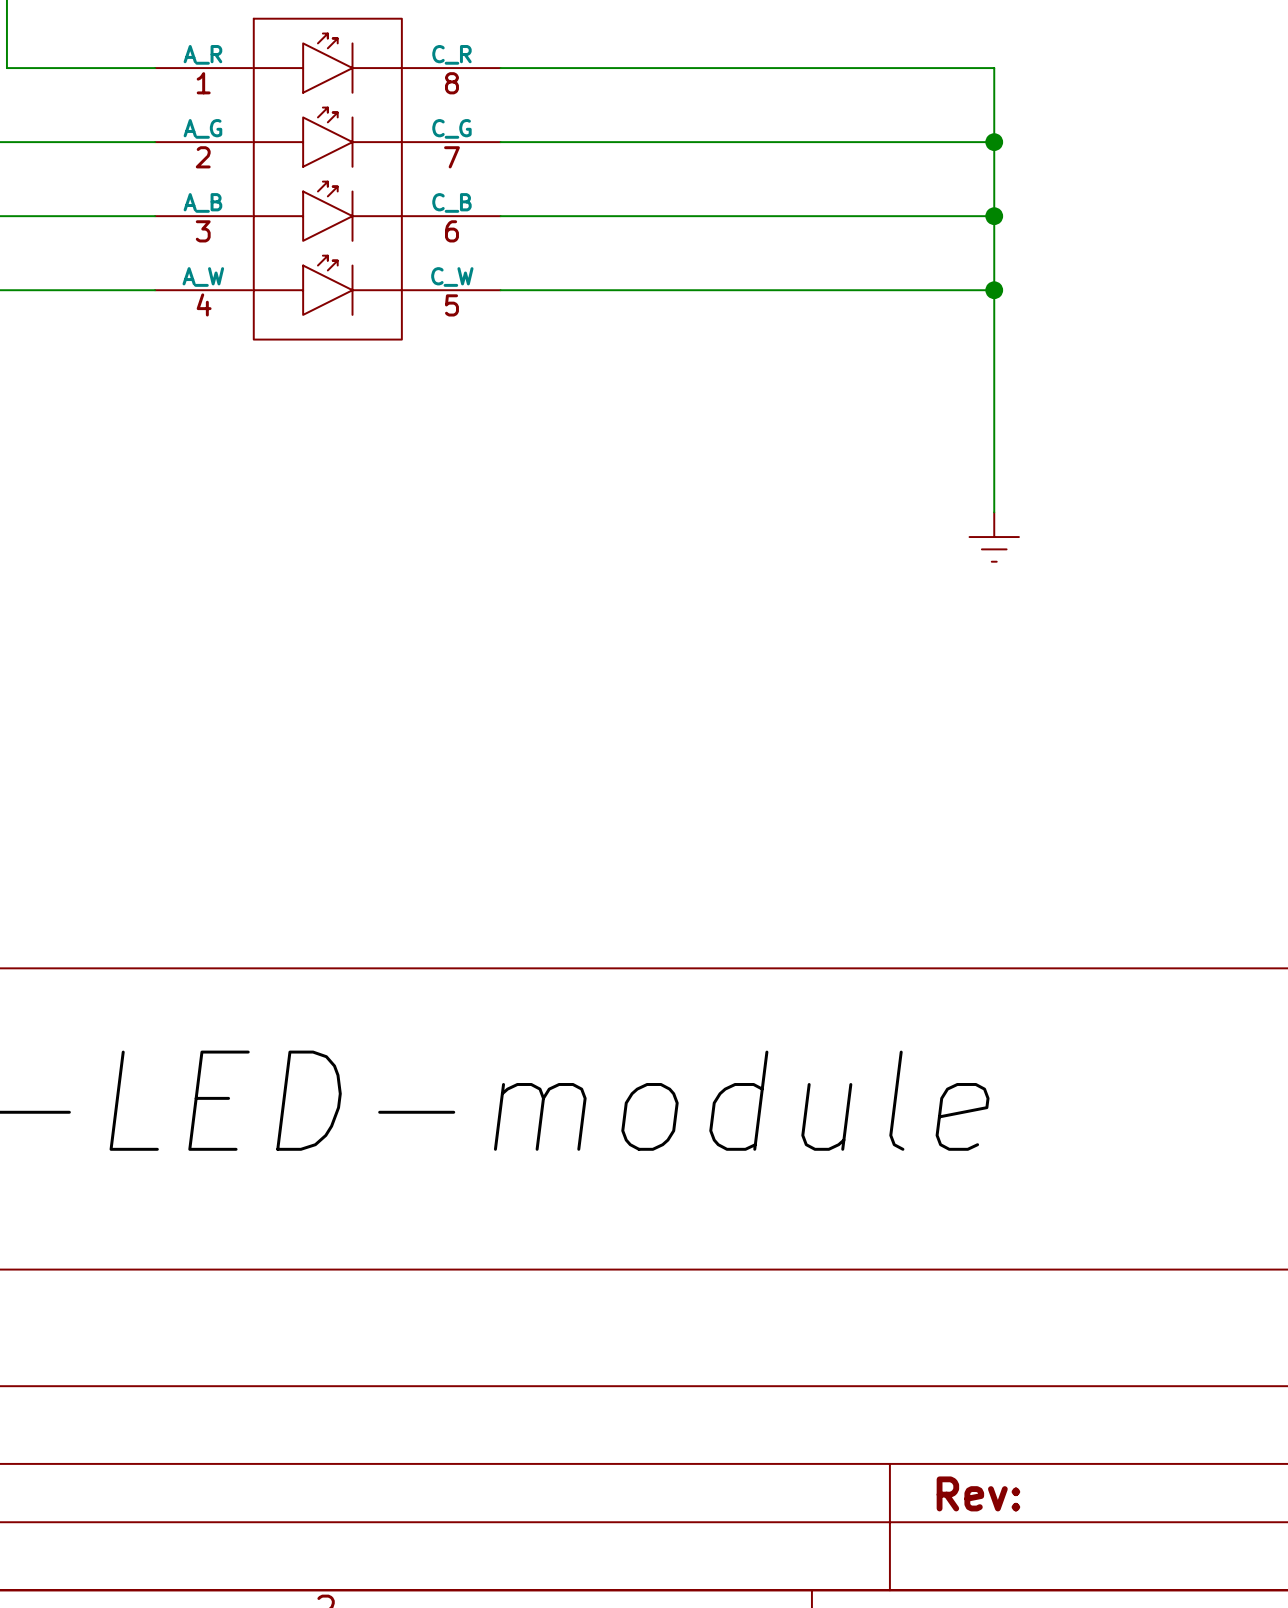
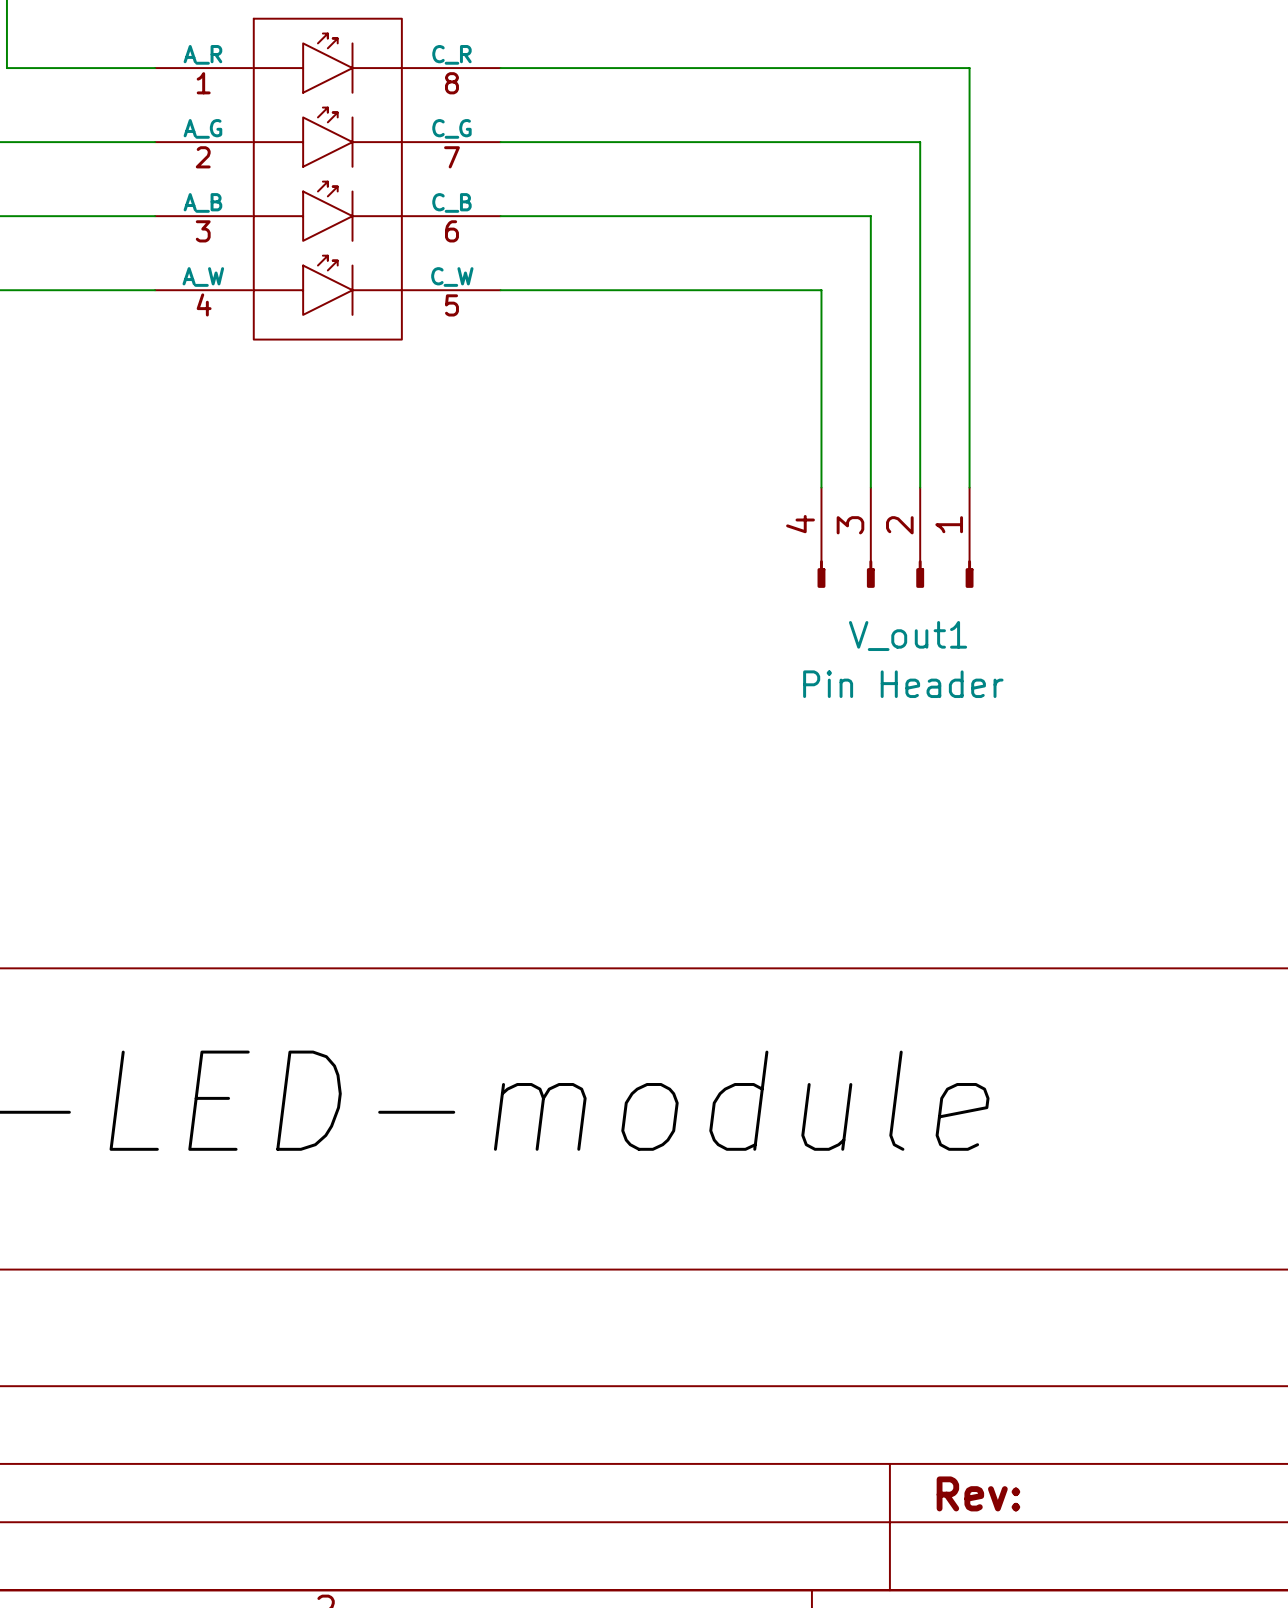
wire: (969, 68) (994, 68) (994, 512) -> (969, 68) (969, 487)
wire: (920, 142) (994, 142) -> (920, 142) (920, 487)
junction: (994, 142) -> none
wire: (870, 216) (994, 216) -> (870, 216) (870, 487)
junction: (994, 216) -> none
wire: (821, 290) (994, 290) -> (821, 290) (821, 487)
junction: (994, 290) -> none
V_out1: none -> Pin Header (895, 537)
power symbol: (994, 537) -> none

